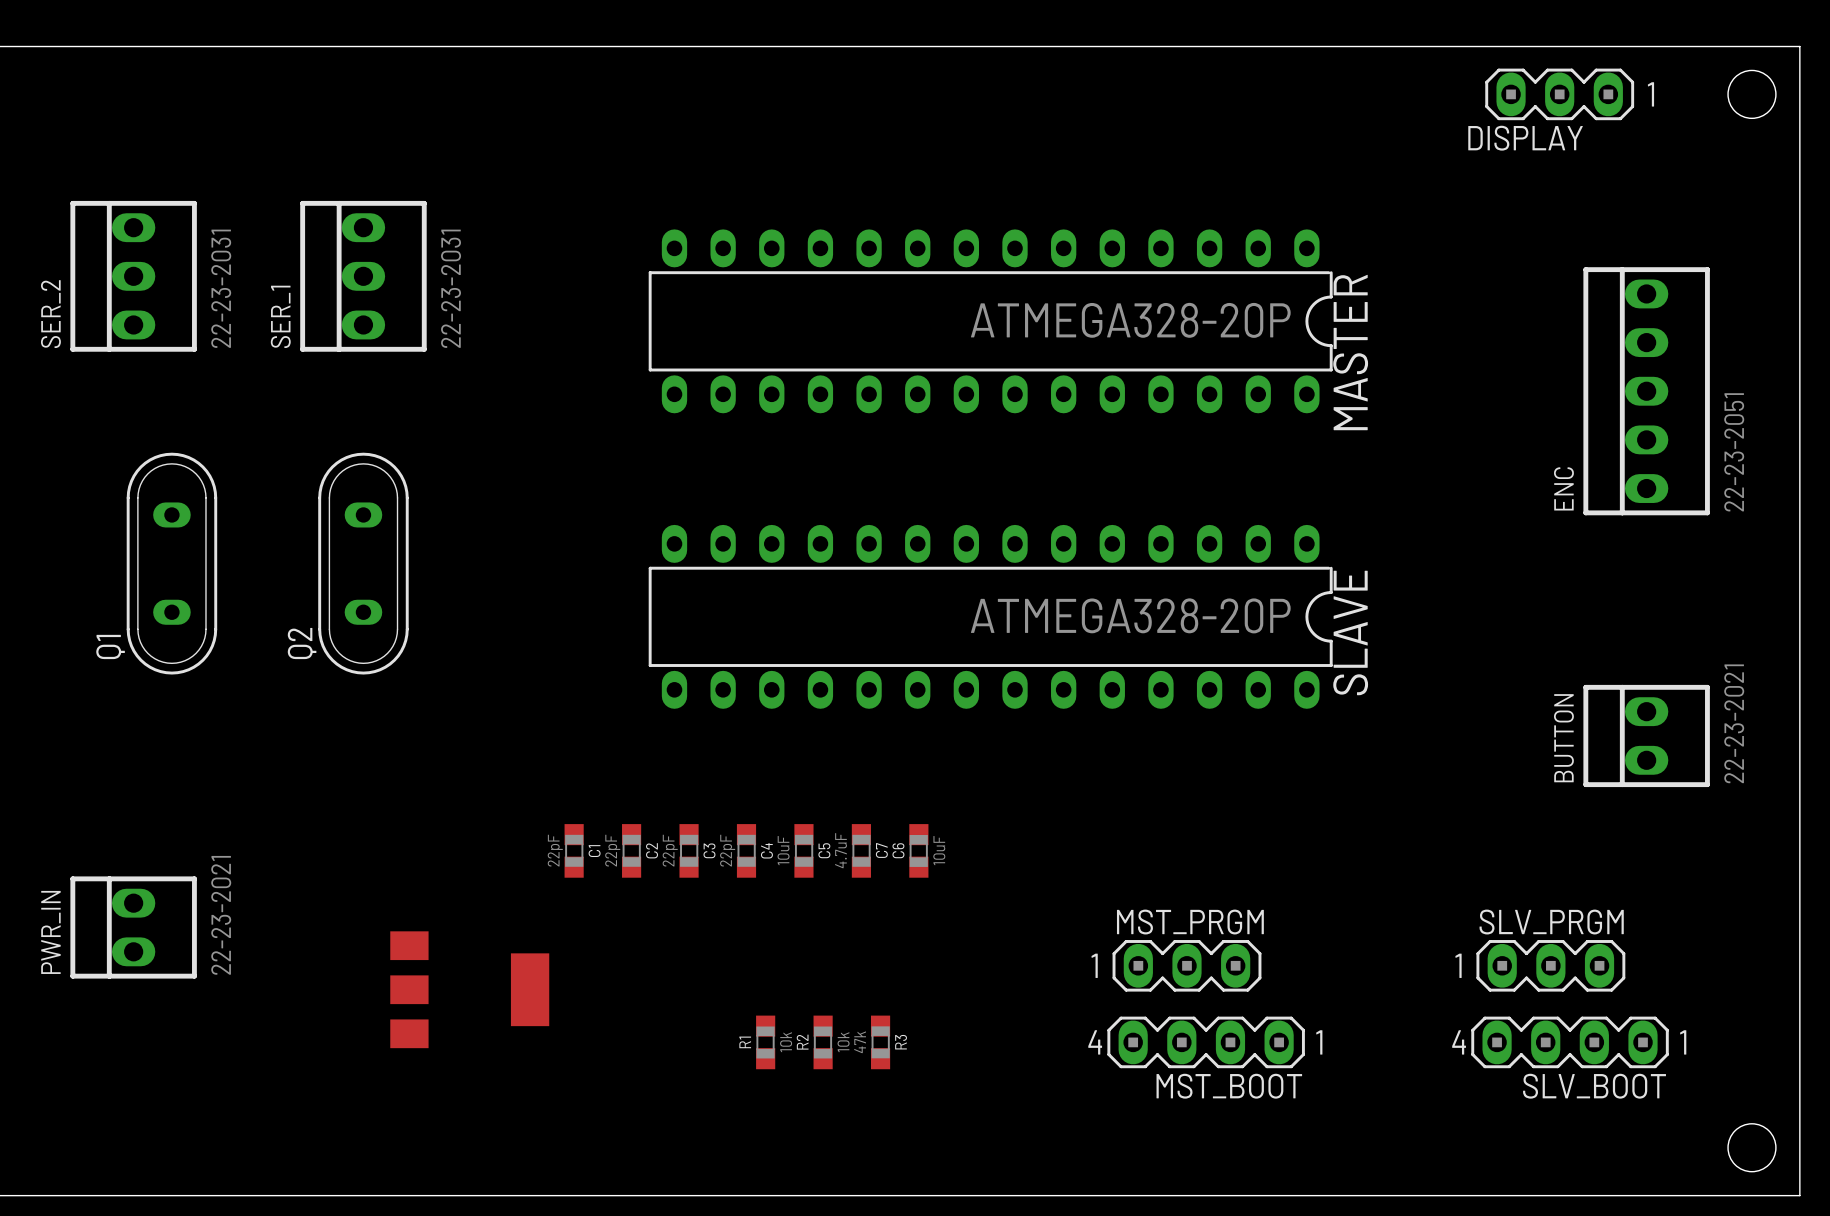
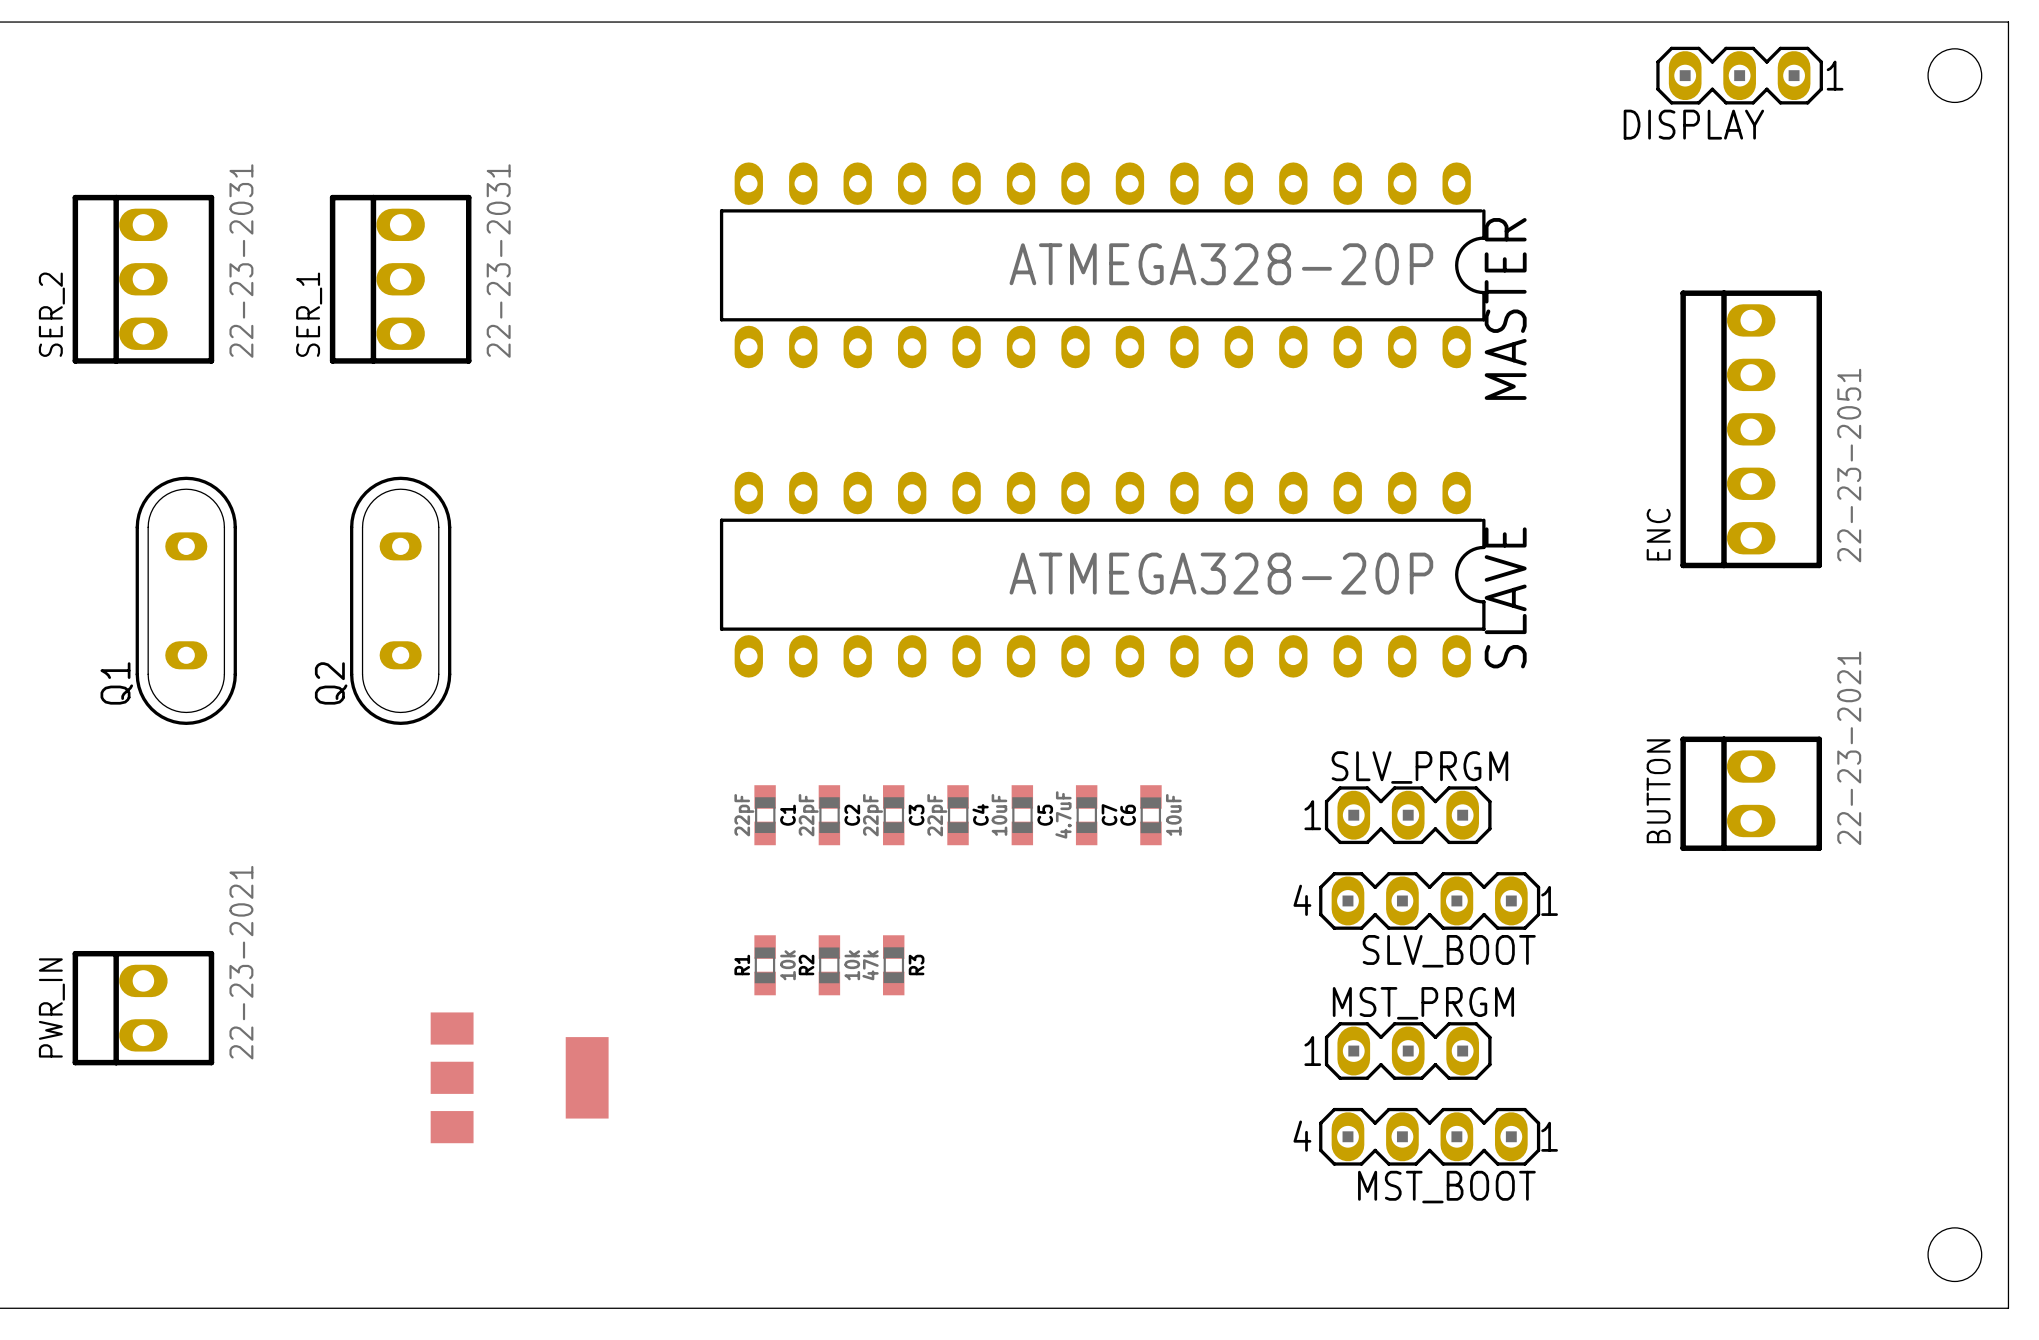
MASTER position: (990, 321) -> (1102, 265)
ENC position: (1646, 391) -> (1751, 429)
SLAVE position: (990, 616) -> (1102, 574)
BUTTON position: (1646, 735) -> (1751, 793)
C1 position: (574, 850) -> (765, 815)
C2 position: (631, 850) -> (829, 815)
C3 position: (689, 850) -> (893, 815)
C4 position: (746, 850) -> (958, 815)
C5 position: (803, 850) -> (1022, 815)
C7 position: (861, 850) -> (1086, 815)
C6 position: (918, 850) -> (1150, 815)
MST_PRGM position: (1186, 965) -> (1408, 1051)
SLV_PRGM position: (1550, 965) -> (1408, 815)
R1 position: (765, 1042) -> (765, 965)
R2 position: (823, 1042) -> (829, 965)
R3 position: (880, 1042) -> (893, 965)
MST_BOOT position: (1206, 1042) -> (1429, 1136)
SLV_BOOT position: (1570, 1042) -> (1429, 900)

